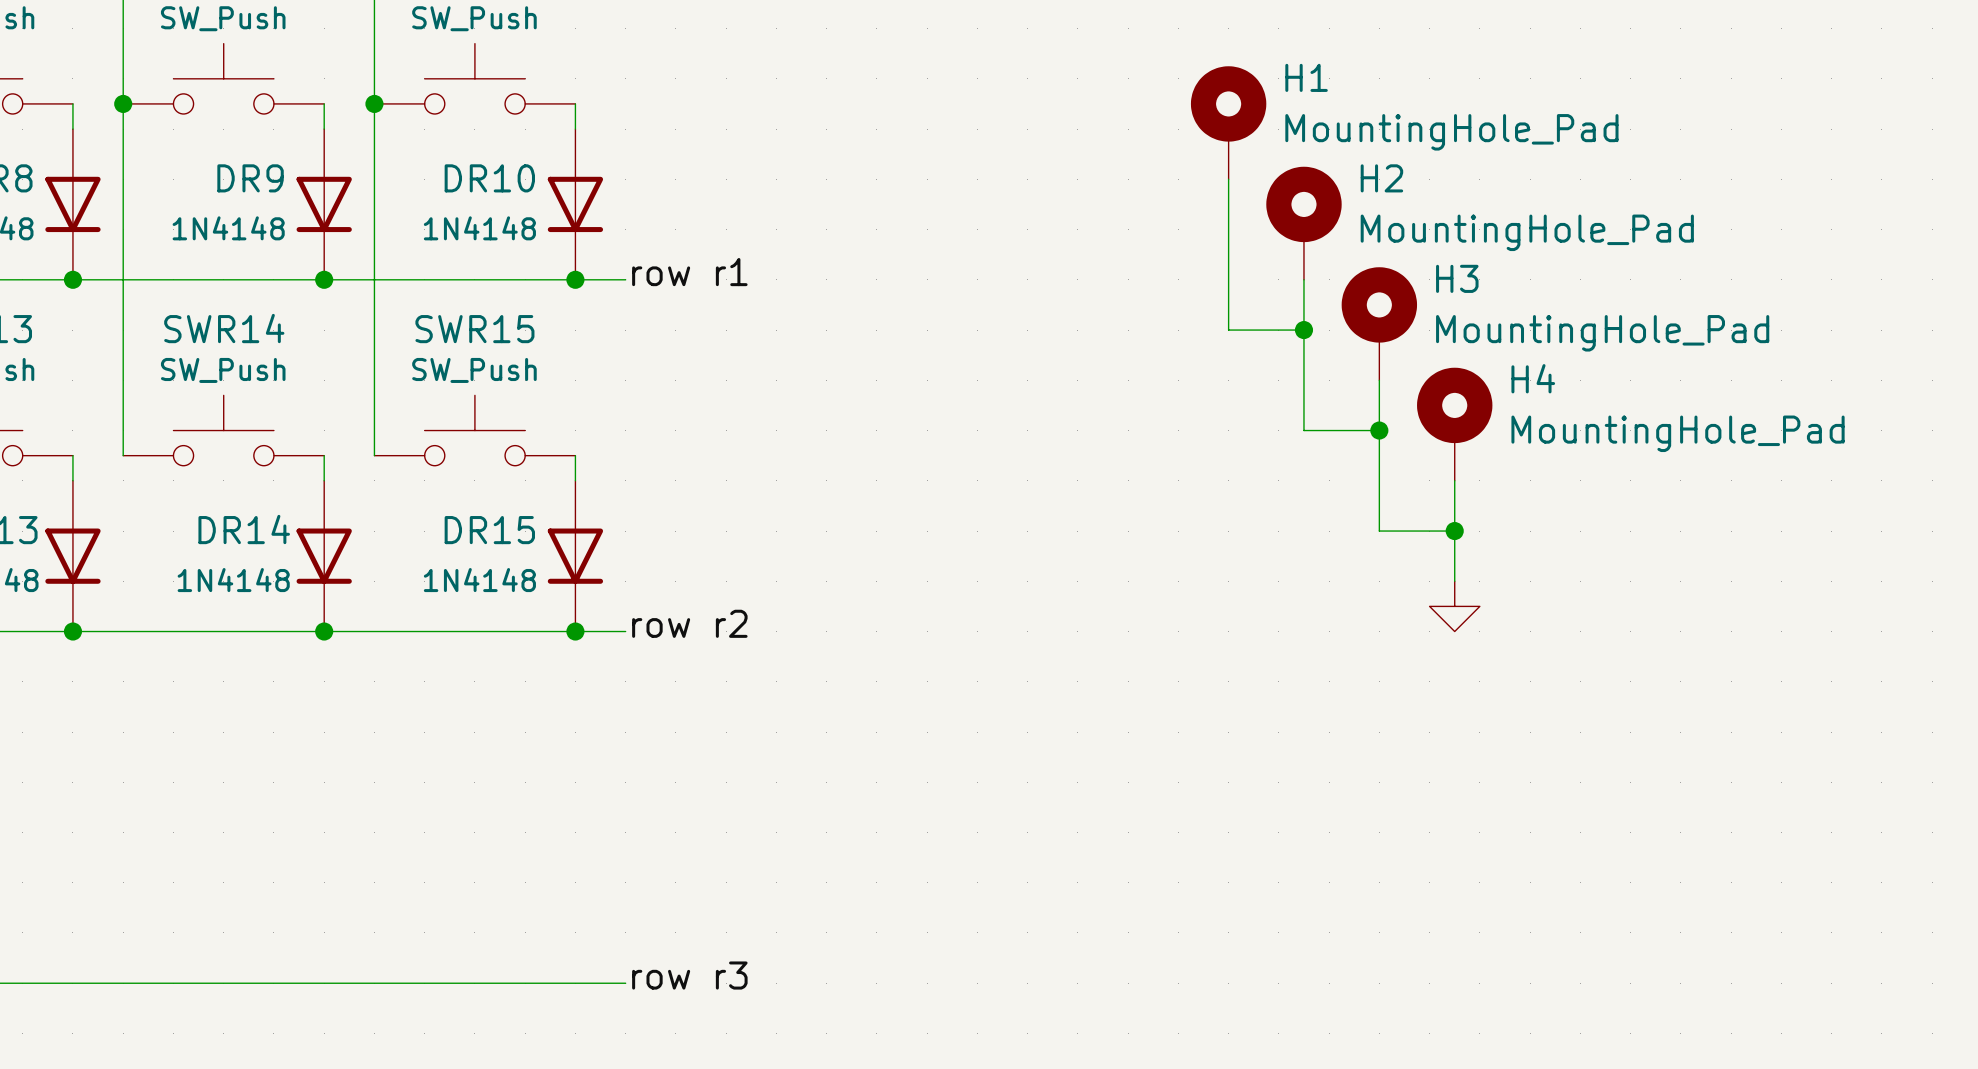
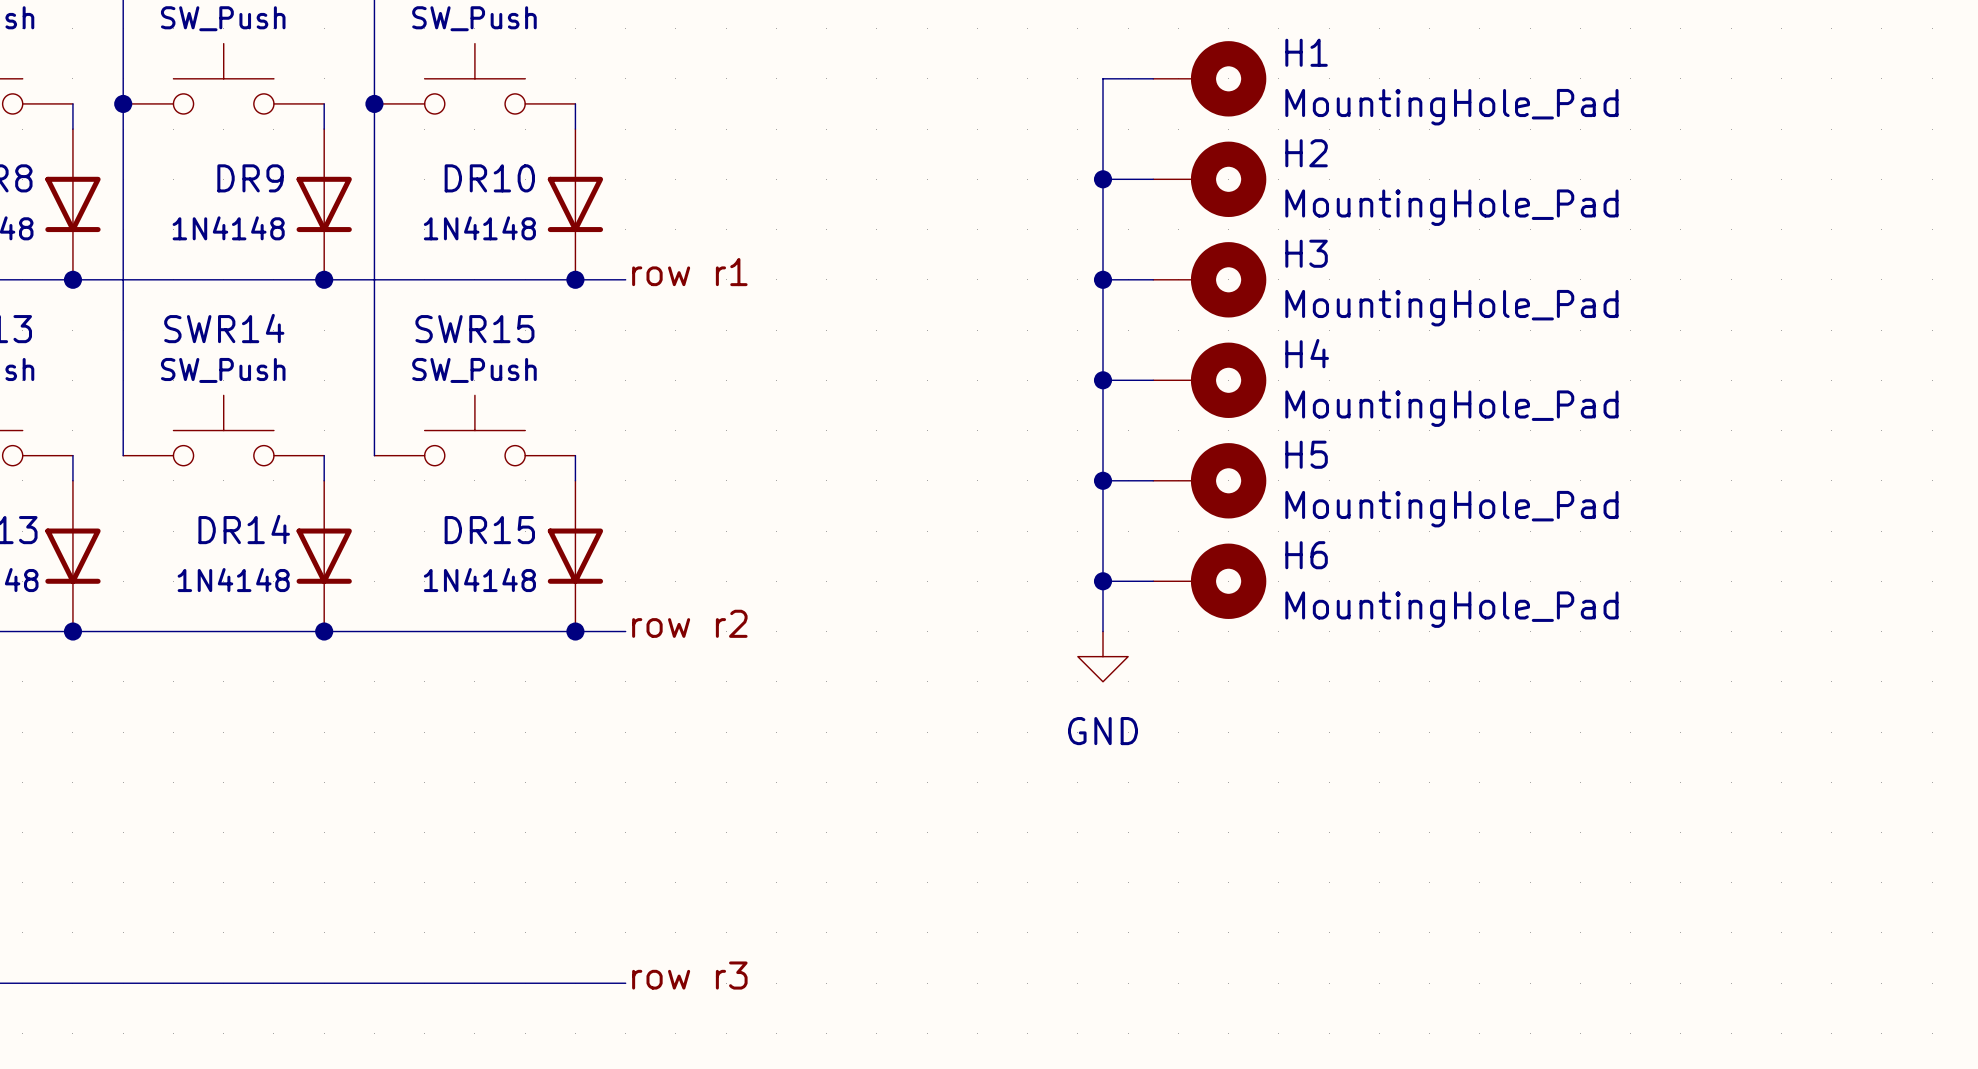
wire: none -> (1153, 78) (1103, 78) (1103, 631)
H1 rotation: 0° (1228, 103) -> 90° clockwise (1228, 78)
wire: none -> (1103, 179) (1153, 179)
junction: none -> (1103, 179)
wire: (1228, 179) (1228, 330) (1303, 330) -> none
H2 rotation: 0° (1303, 204) -> 90° clockwise (1228, 179)
H2 position: (1303, 223) -> (1209, 179)
wire: none -> (1103, 279) (1153, 279)
junction: none -> (1103, 279)
wire: (1303, 279) (1303, 430) (1379, 430) -> none
H3 rotation: 0° (1379, 304) -> 90° clockwise (1228, 279)
H3 position: (1379, 323) -> (1209, 279)
junction: (1303, 330) -> none
wire: none -> (1103, 380) (1153, 380)
junction: none -> (1103, 380)
wire: (1379, 380) (1379, 531) (1454, 531) -> none
H4 rotation: 0° (1454, 405) -> 90° clockwise (1228, 380)
H4 position: (1454, 424) -> (1209, 380)
junction: (1379, 430) -> none
wire: none -> (1103, 480) (1153, 480)
junction: none -> (1103, 480)
H5: none -> MountingHole_Pad (1209, 480)
wire: (1454, 480) (1454, 581) -> none
junction: (1454, 531) -> none
wire: none -> (1103, 581) (1153, 581)
junction: none -> (1103, 581)
H6: none -> MountingHole_Pad (1209, 581)
power symbol: (1454, 606) -> none
power symbol: none -> GND (1103, 656)

